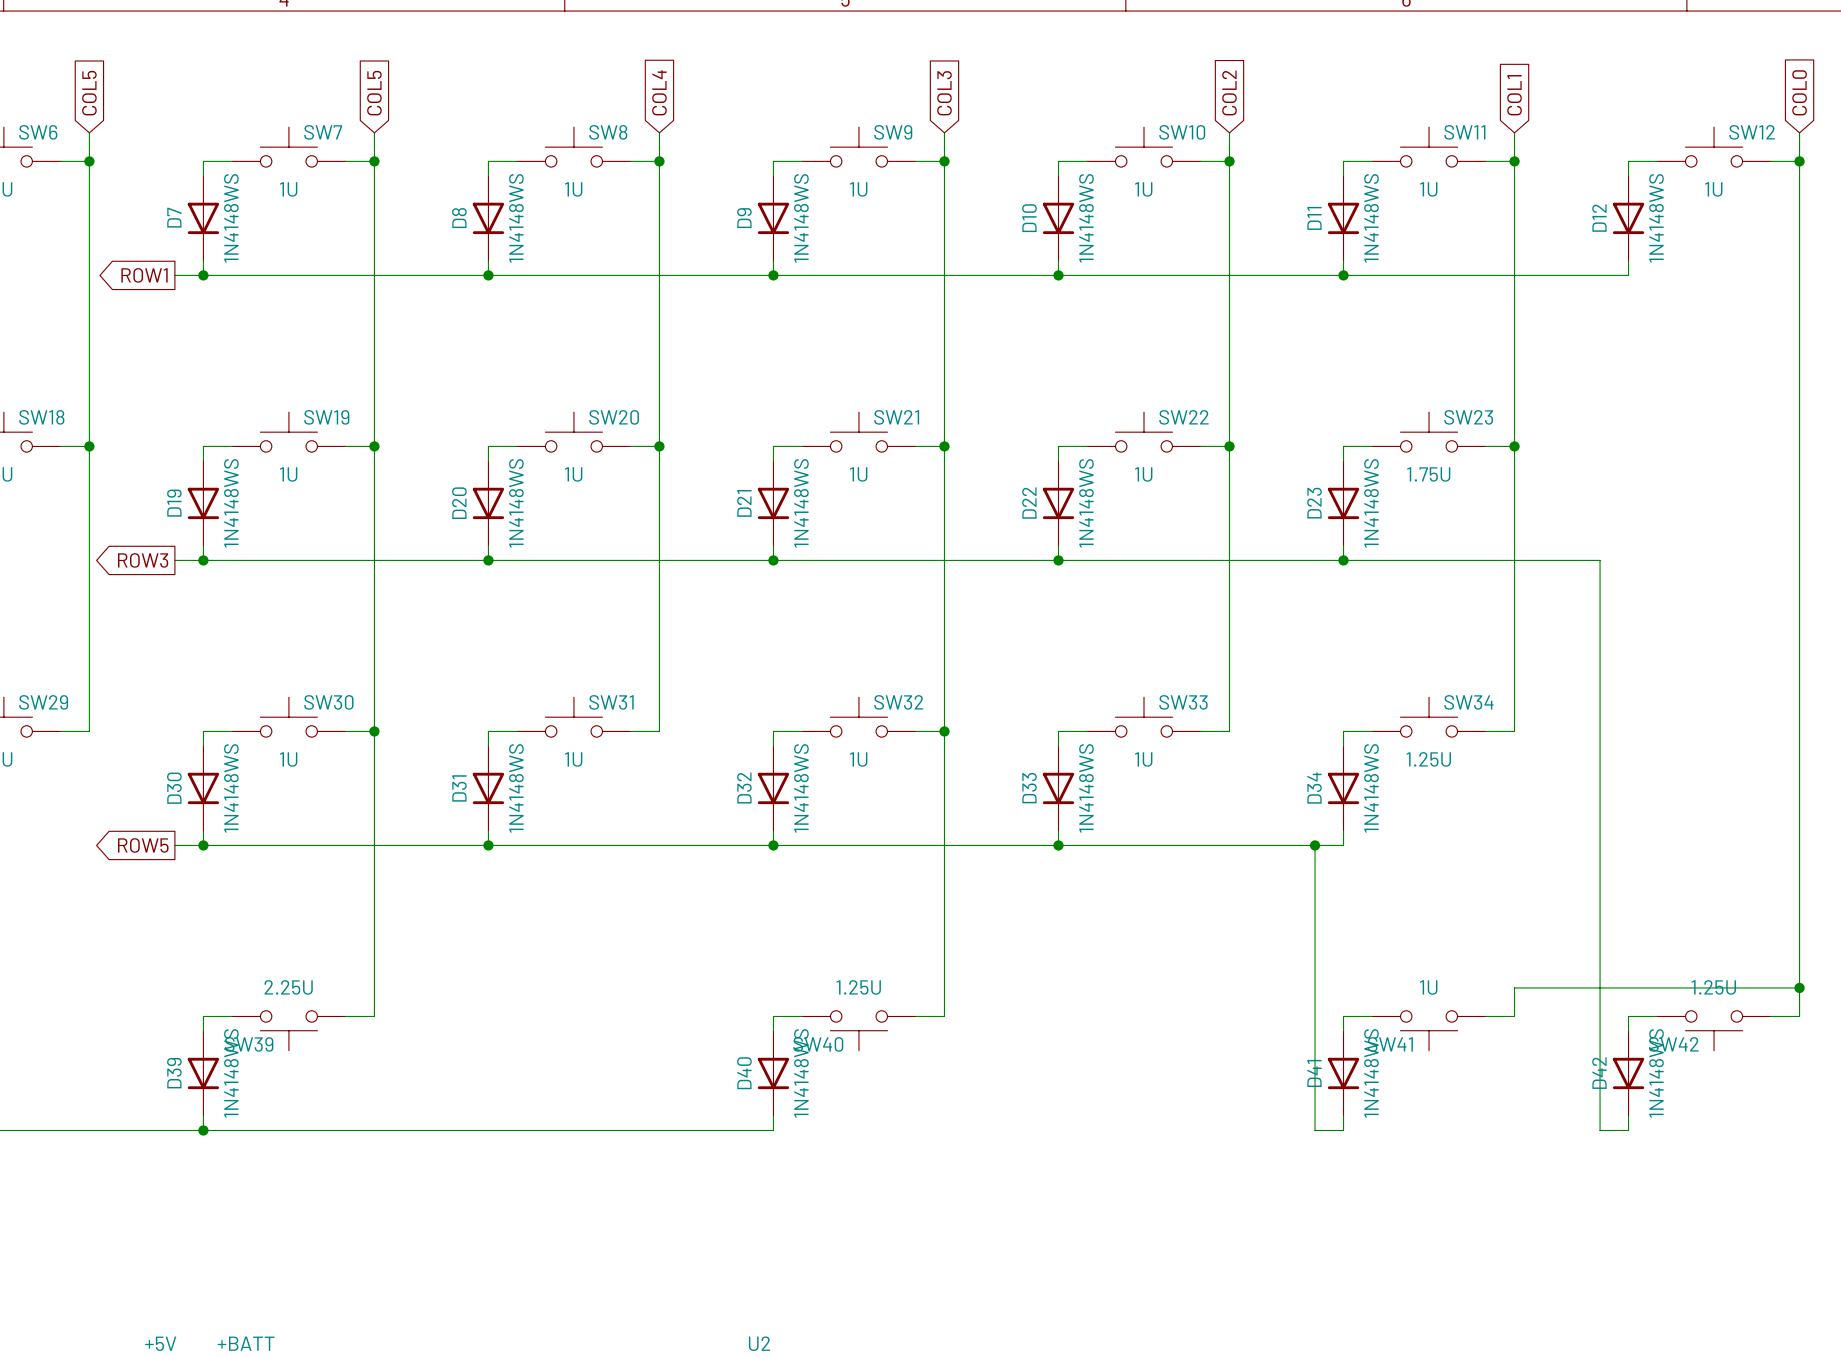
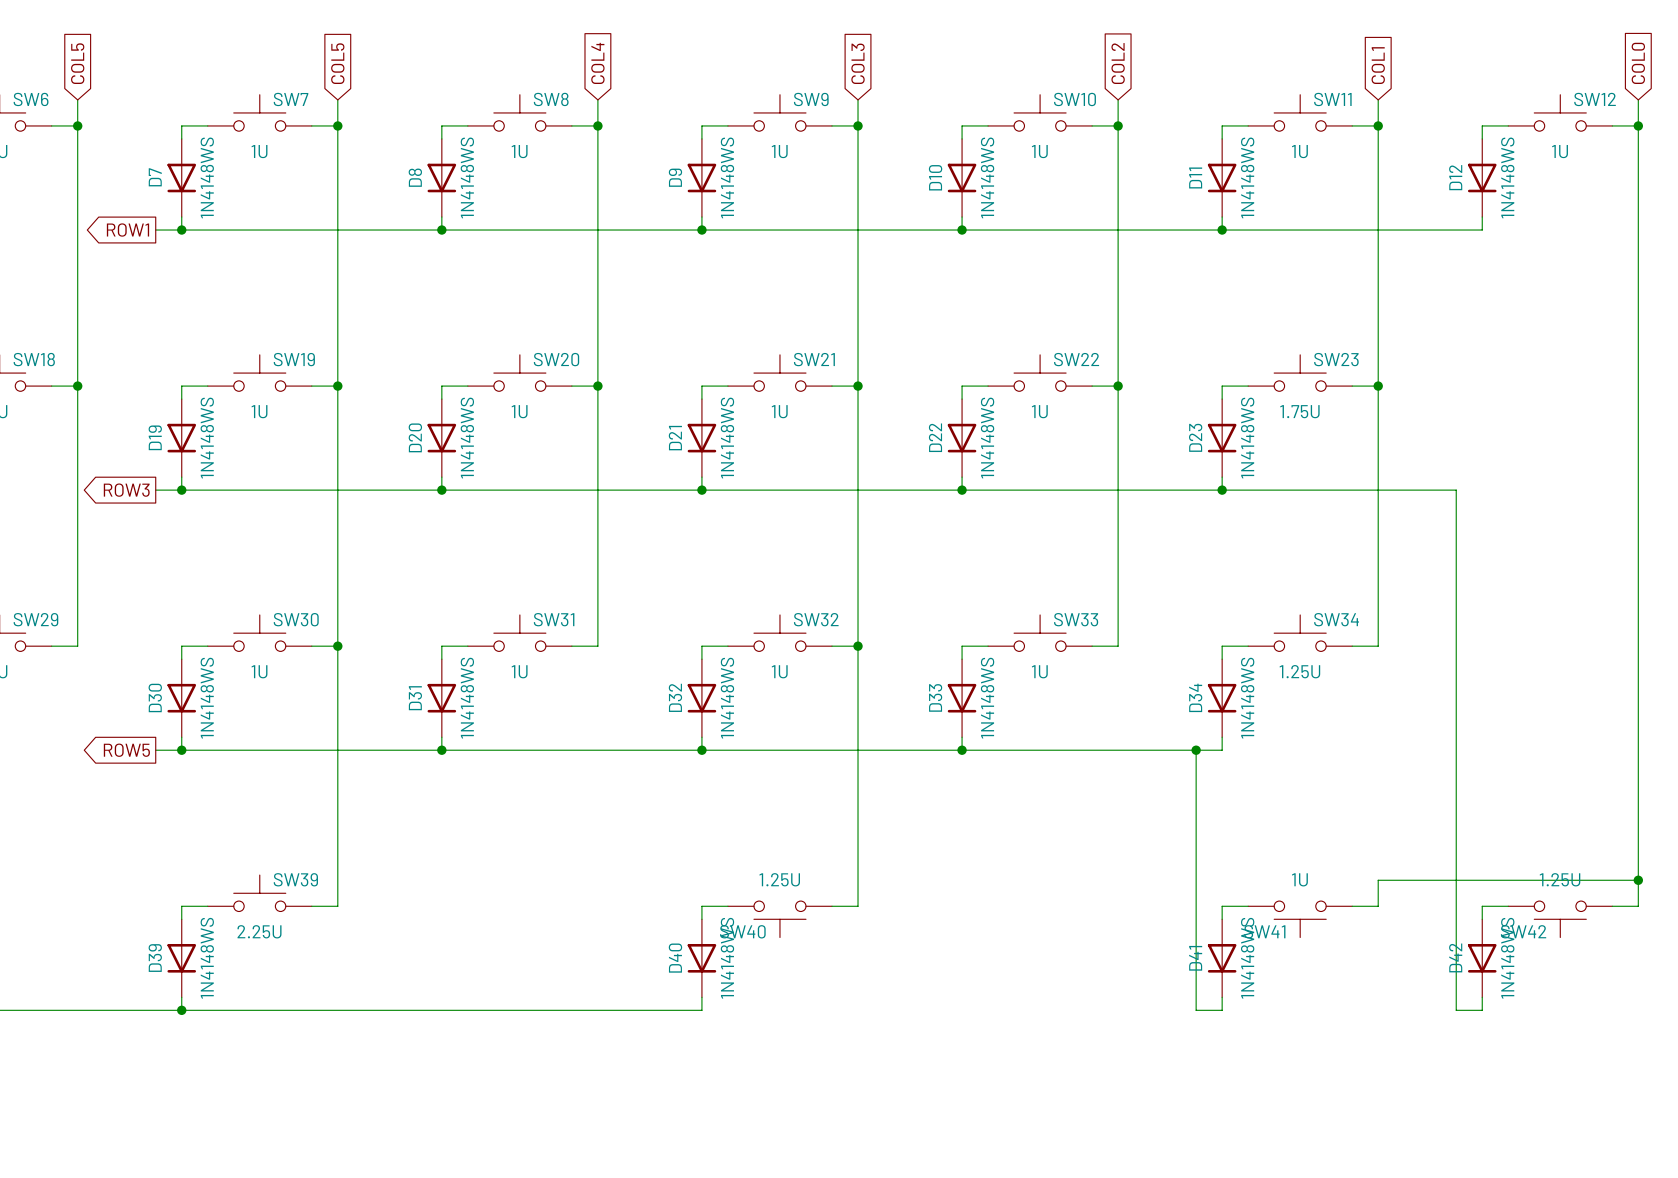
SW39 rotation: 0° (288, 1030) -> 180° (259, 893)

